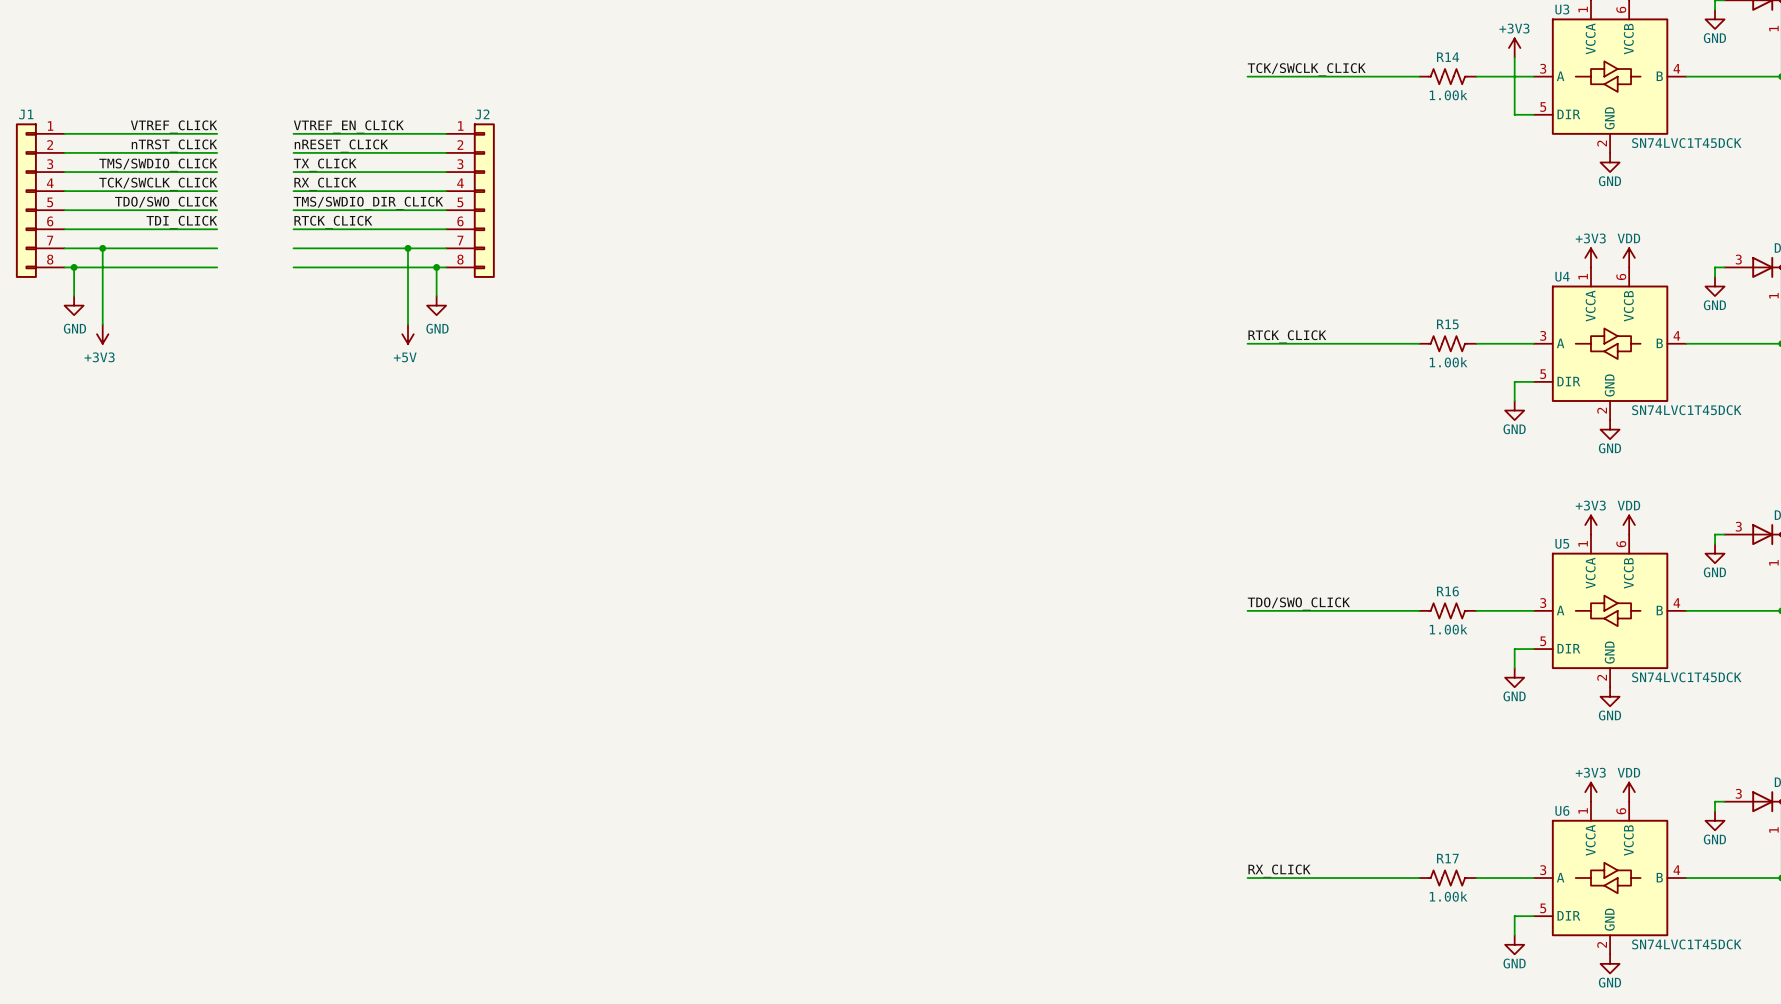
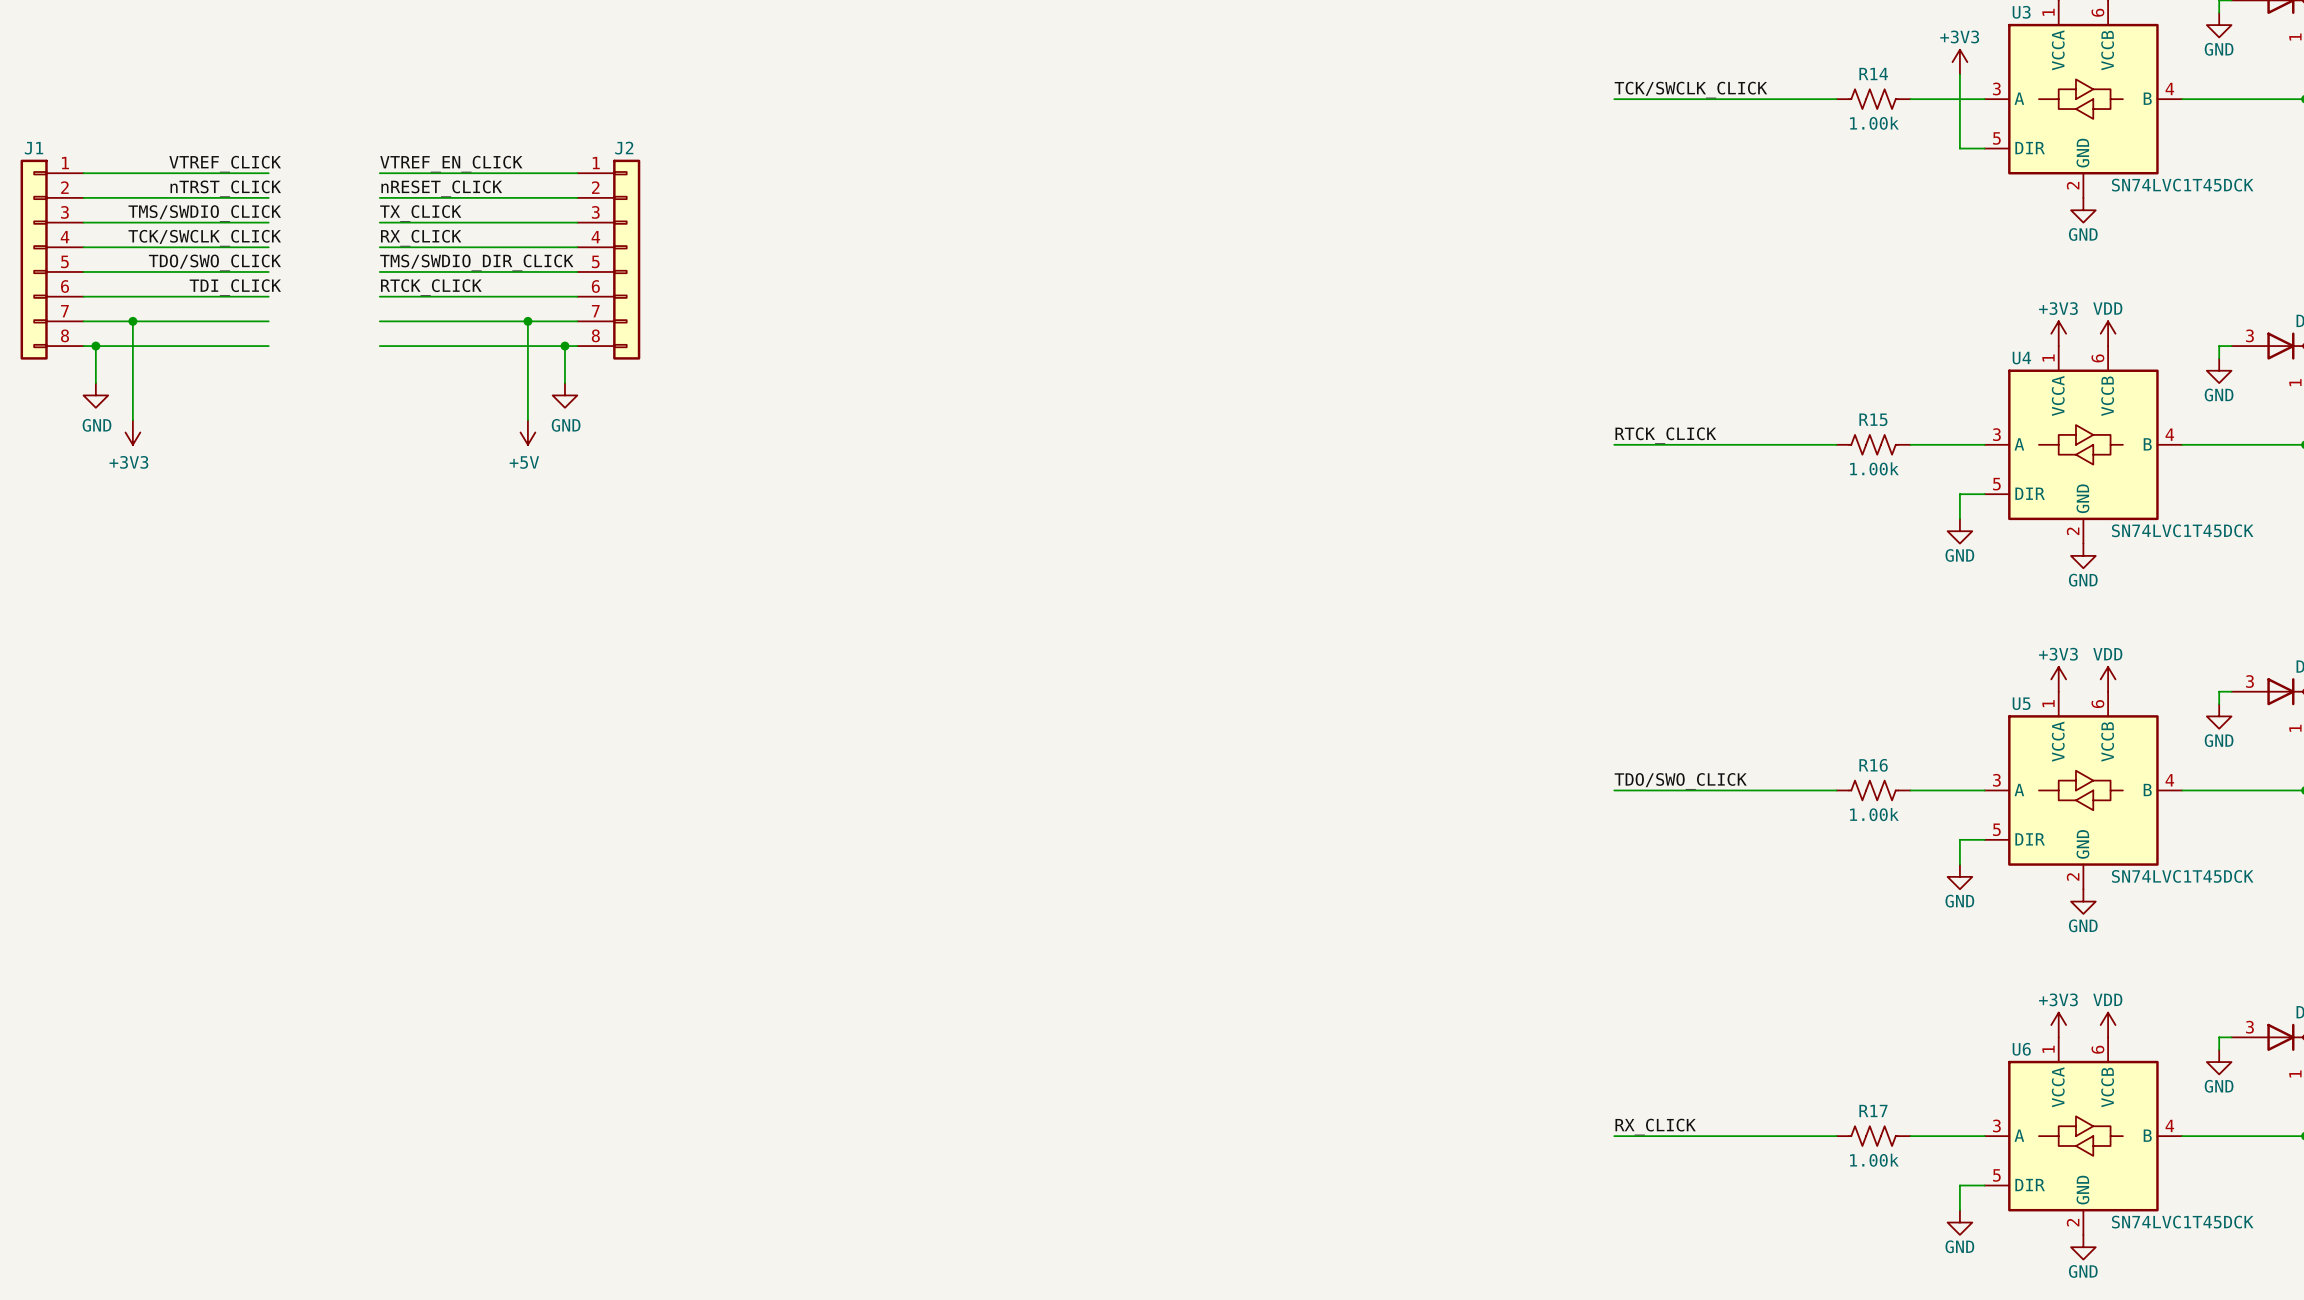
wire: (207, 133) (217, 133) -> none
wire: (207, 152) (217, 152) -> none
wire: (207, 172) (217, 172) -> none
wire: (207, 191) (217, 191) -> none
wire: (207, 210) (217, 210) -> none
wire: (207, 229) (217, 229) -> none
wire: (207, 248) (217, 248) -> none
wire: (207, 267) (217, 267) -> none

